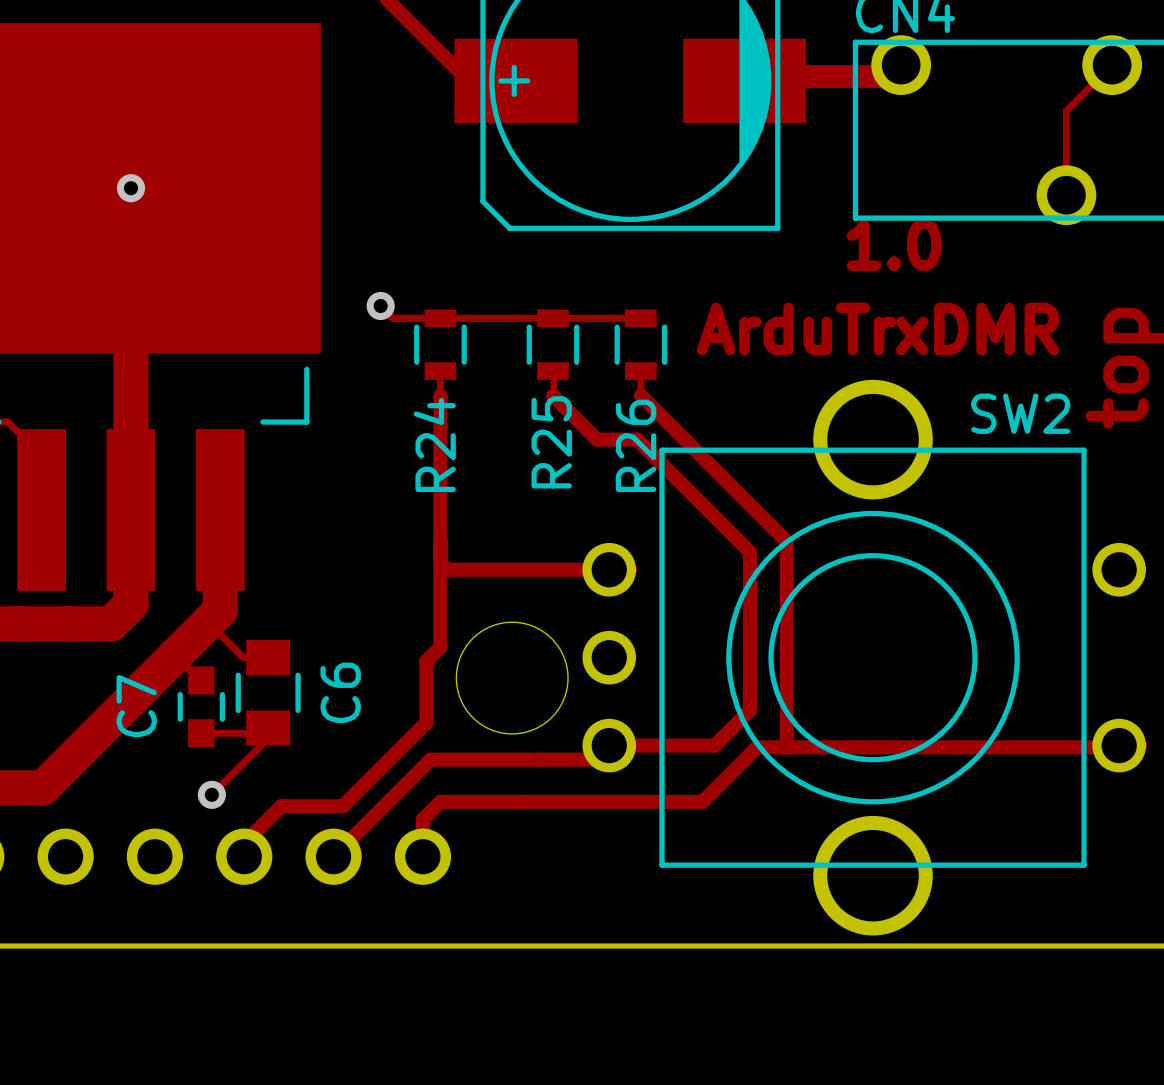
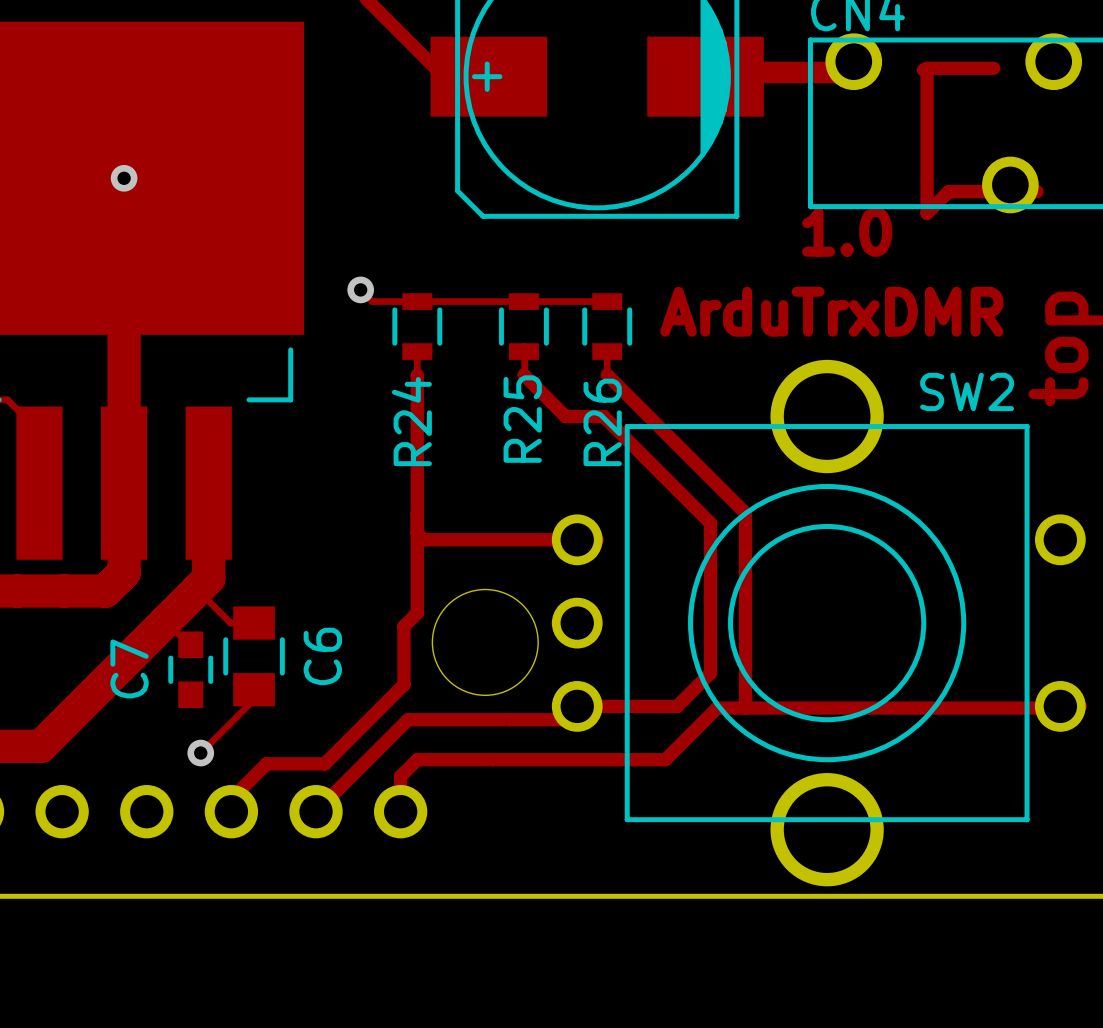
track: (1112, 65) (1066, 110) (1066, 195) -> none
track: none -> (993, 68) (927, 68) (925, 70)
track: none -> (923, 70) (927, 70) (927, 213) (948, 191) (1037, 191)
track: (268, 728) (262, 733) (201, 733) -> none

